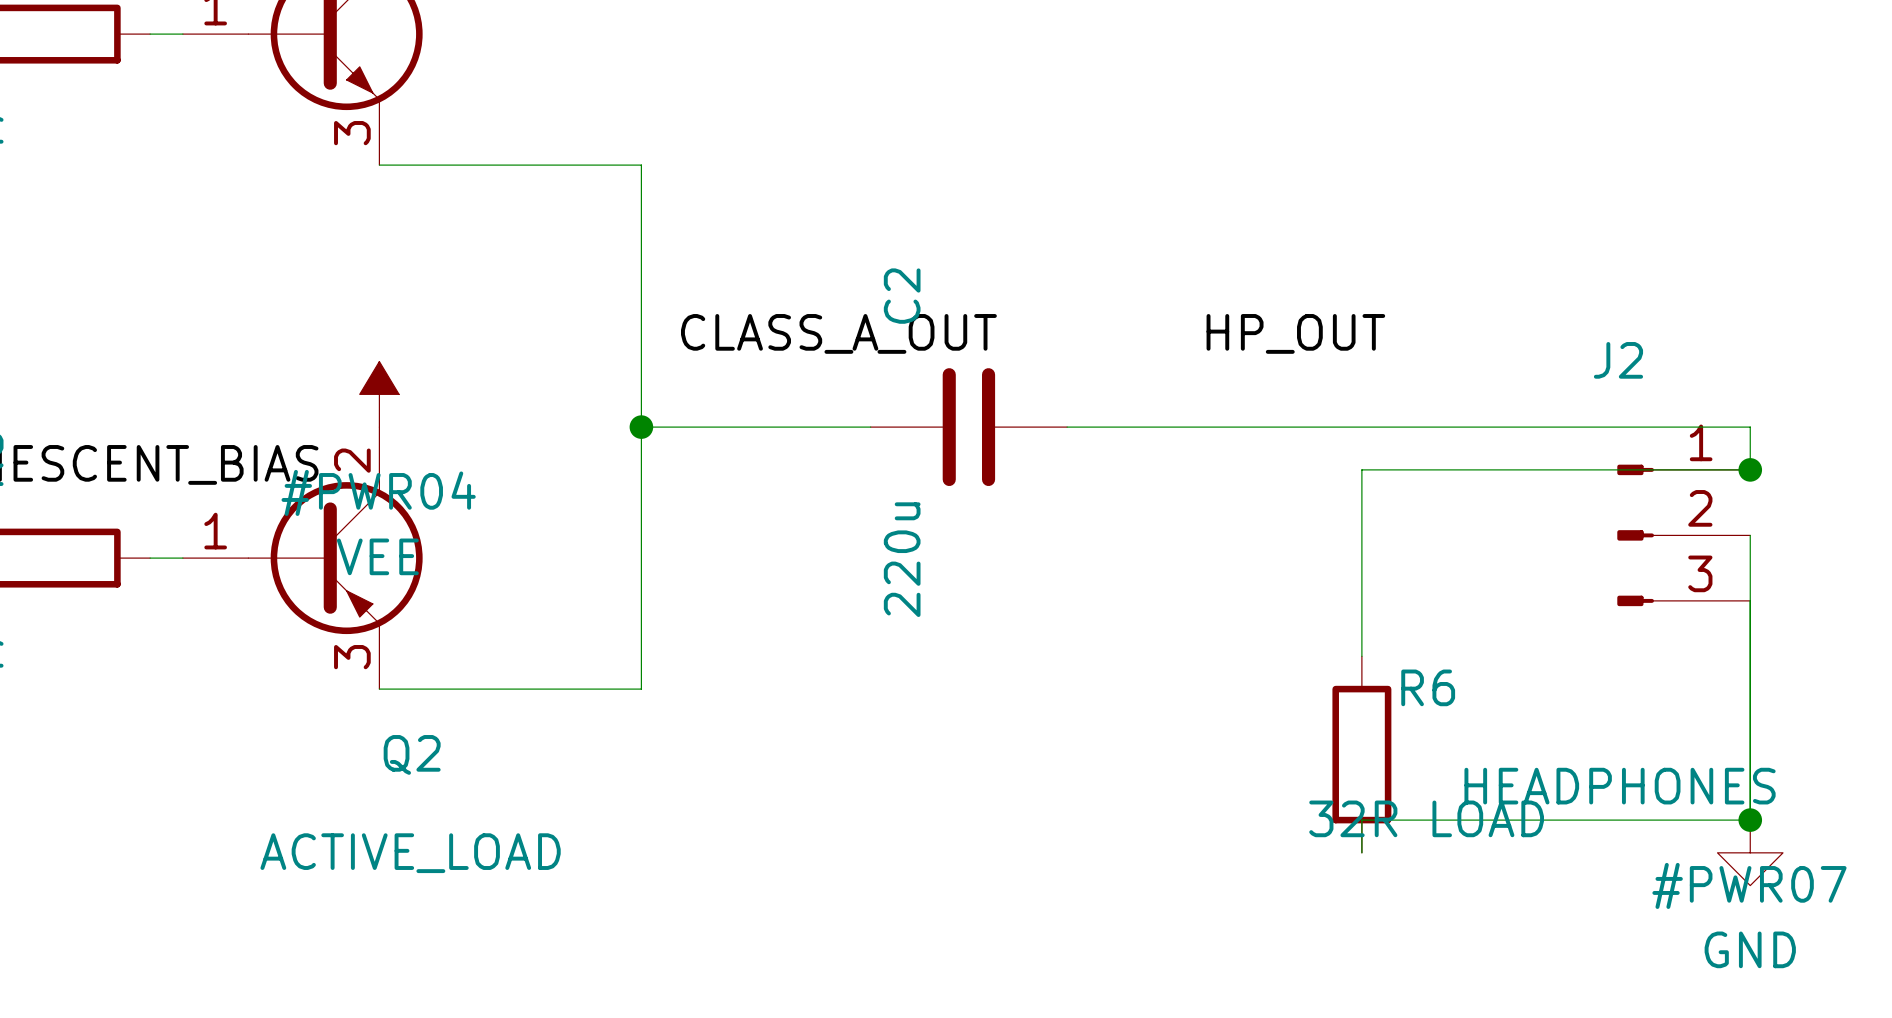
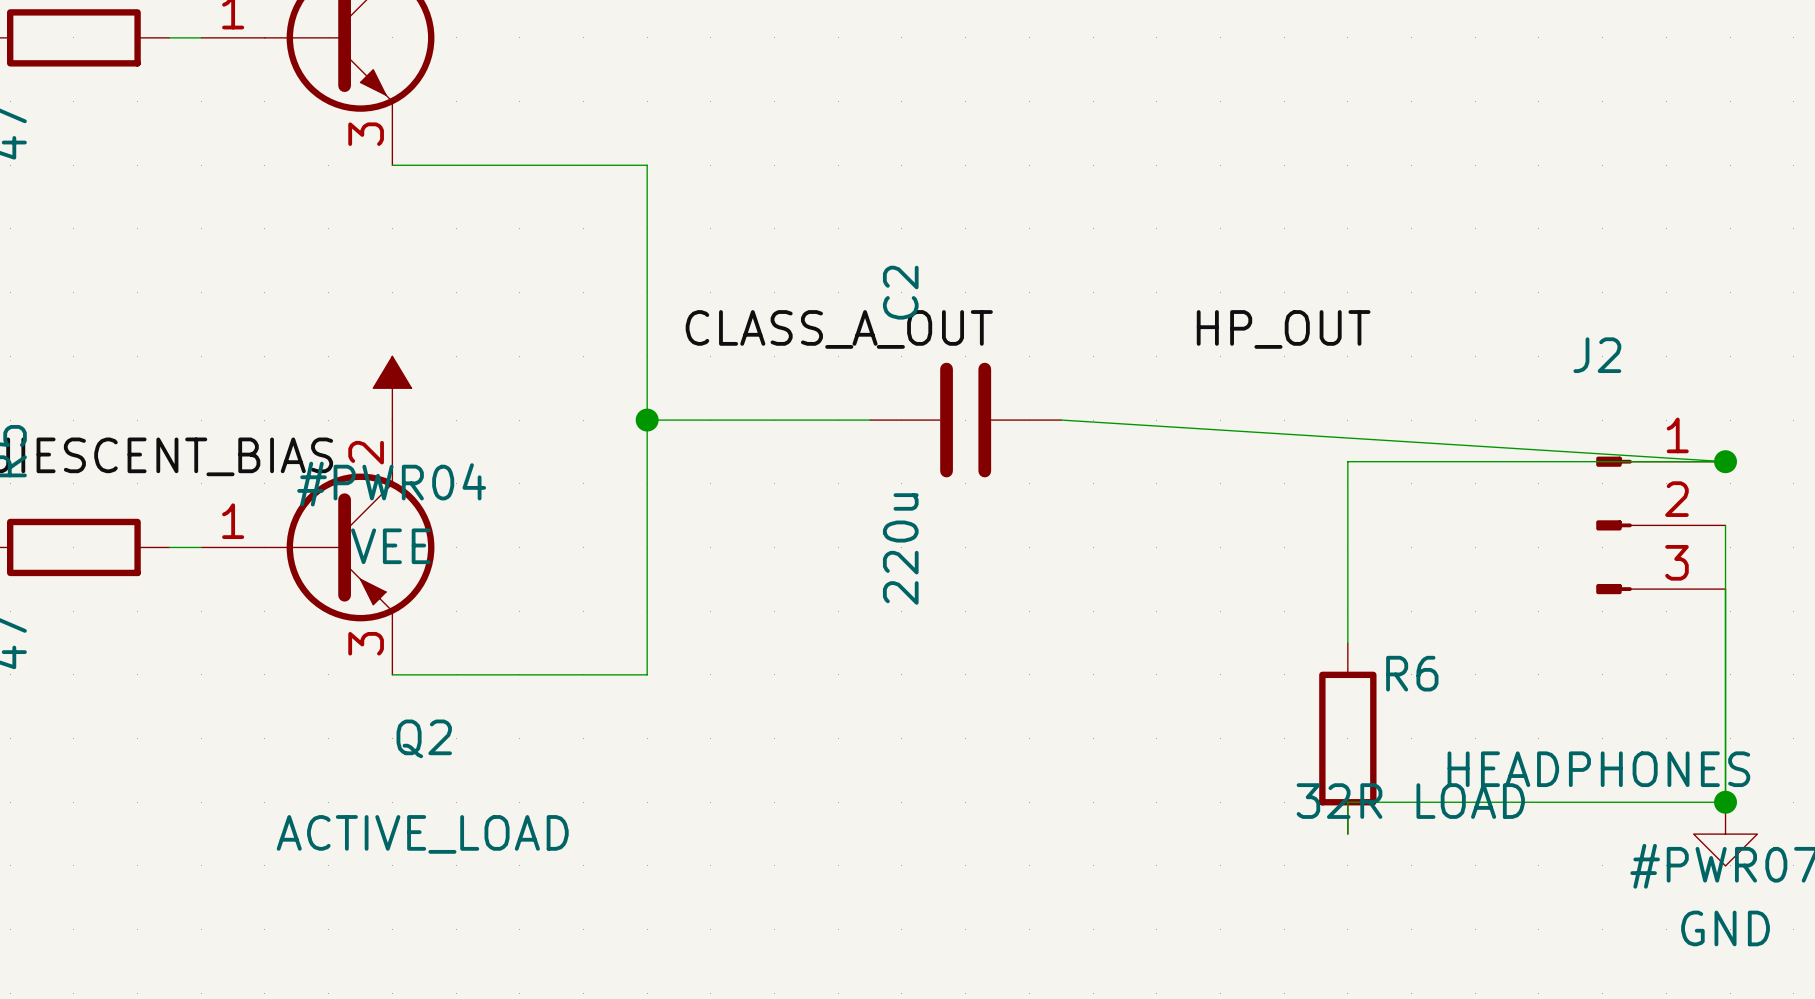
wire: (1067, 427) (1750, 427) (1750, 469) -> (1061, 420) (1725, 461)

